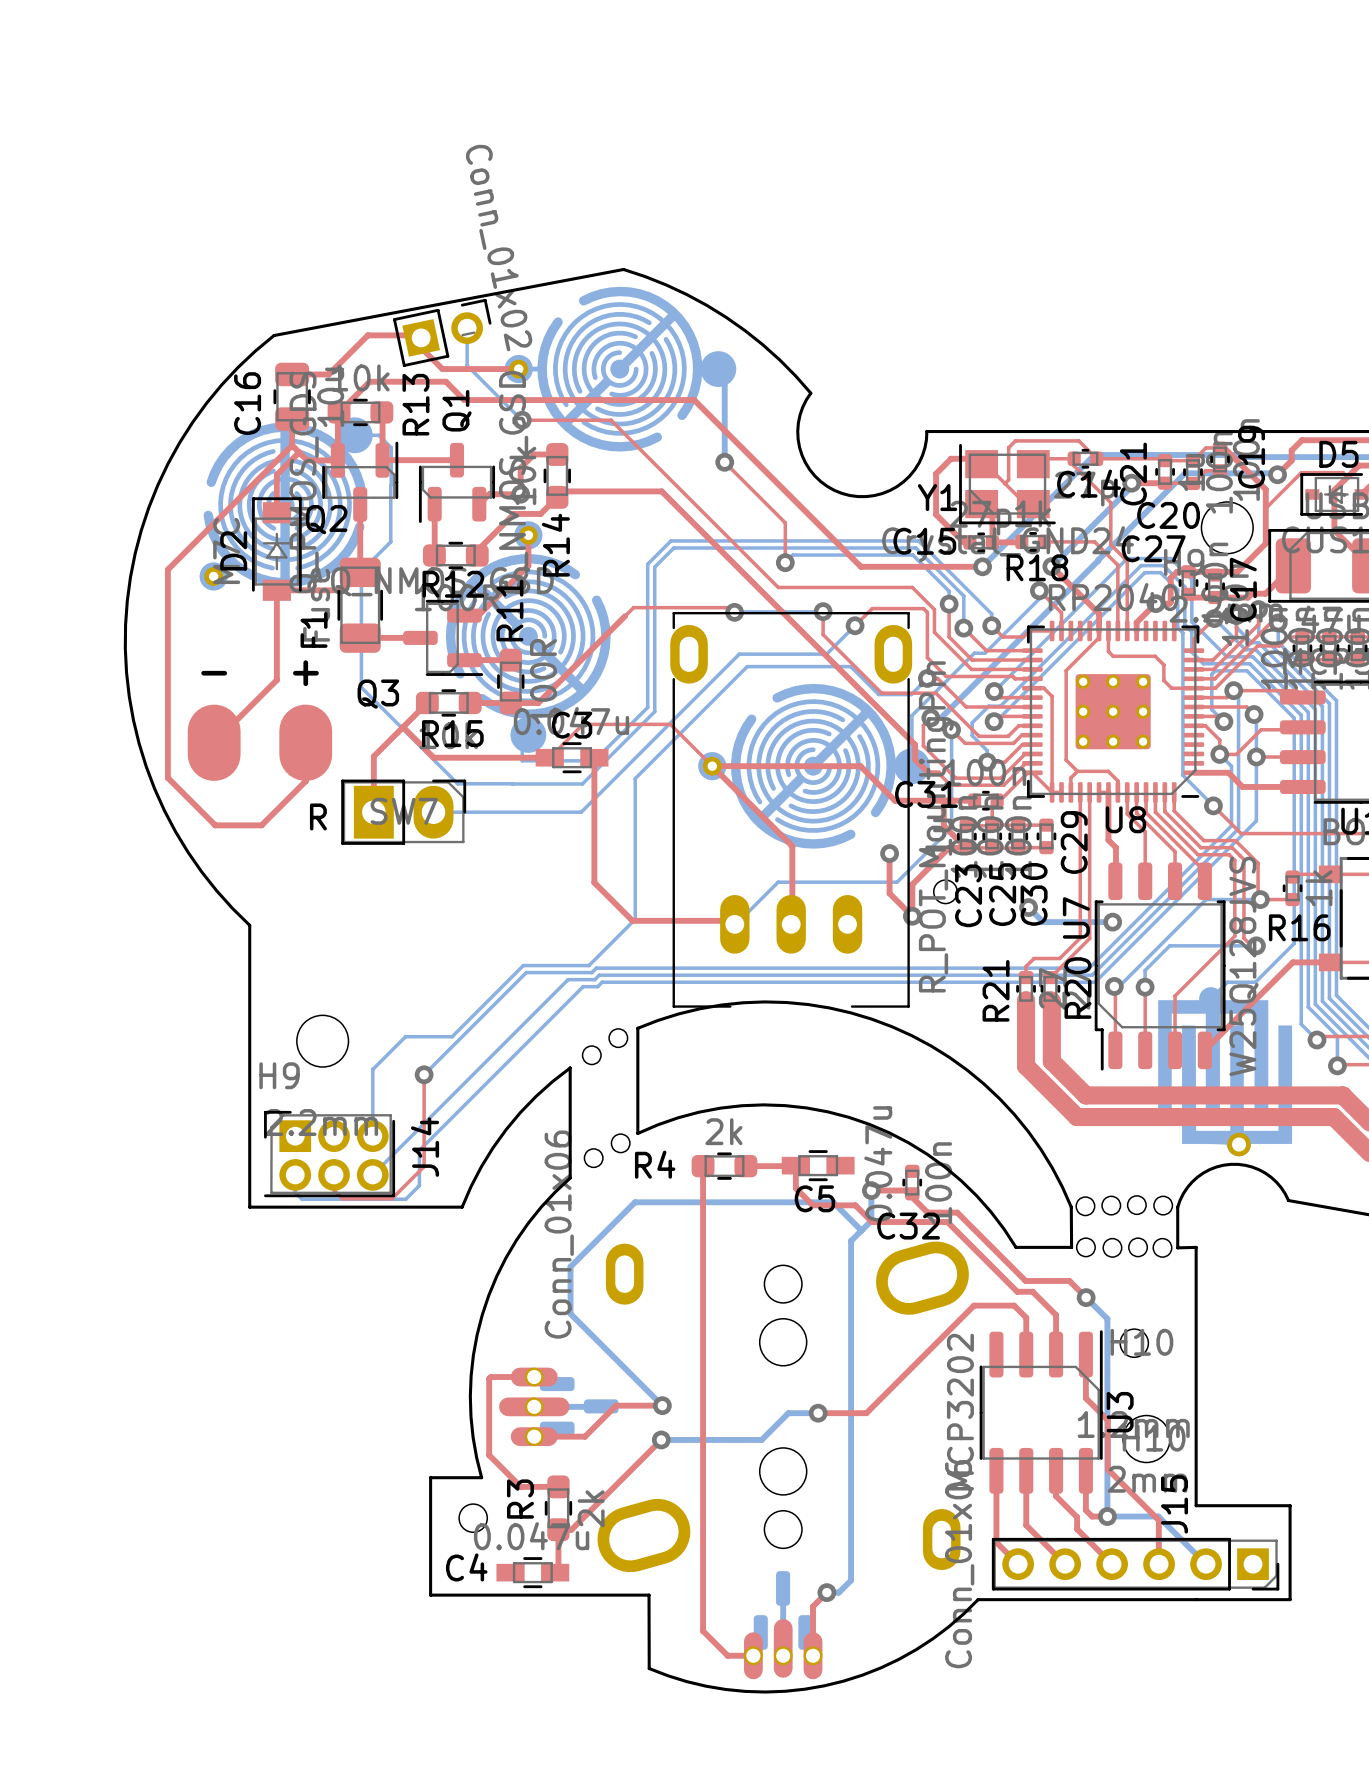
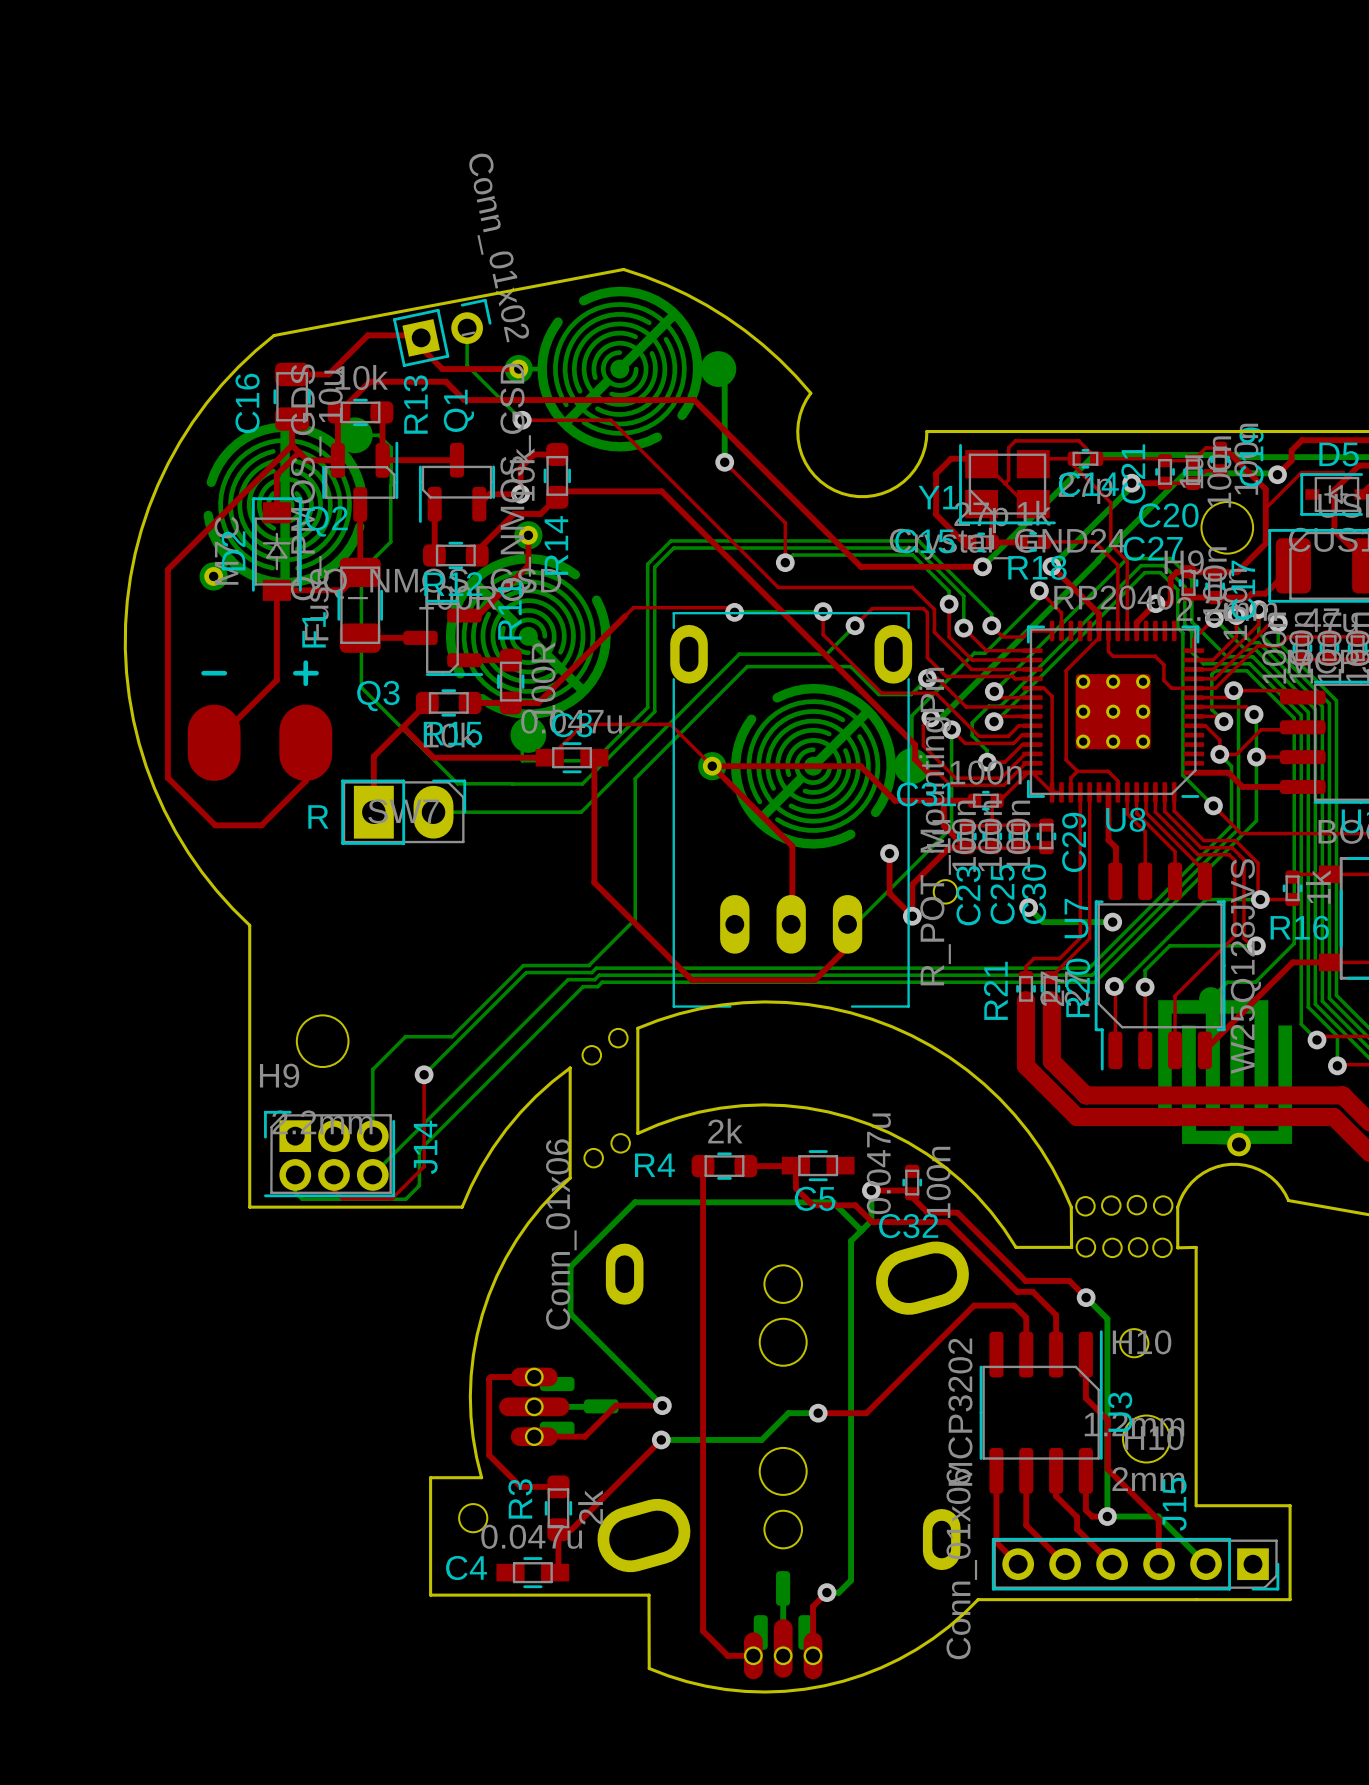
bottom track: (897, 882) (778, 882) (735, 924) -> (897, 882) (854, 924) (847, 924)
top track: (632, 920) (735, 920) -> (632, 920) (691, 980) (814, 980) (847, 947) (847, 924)

